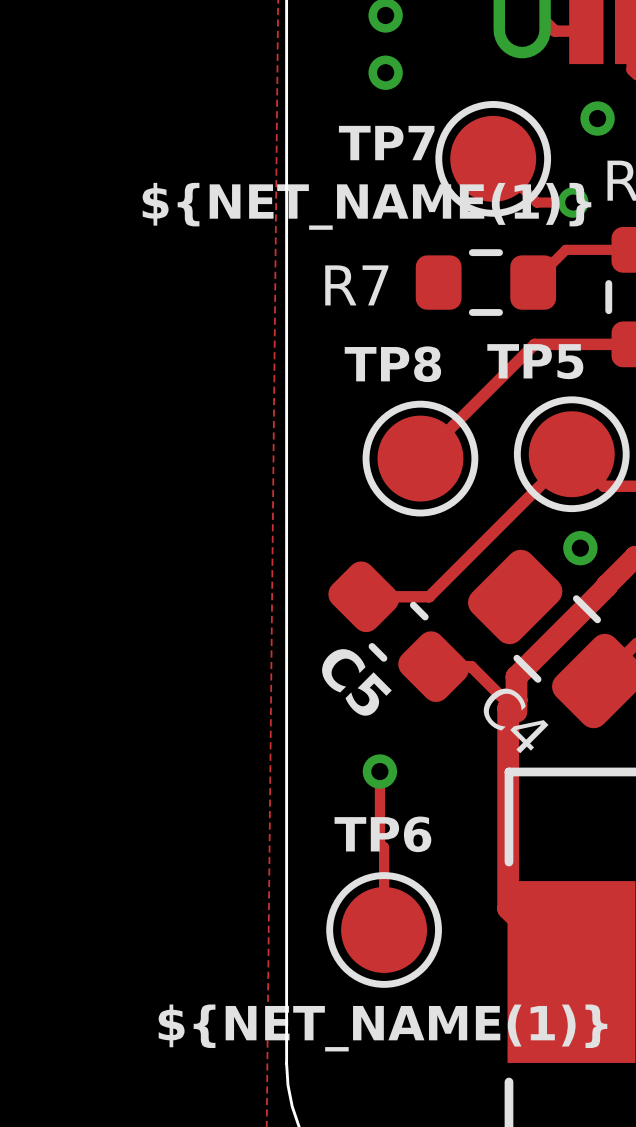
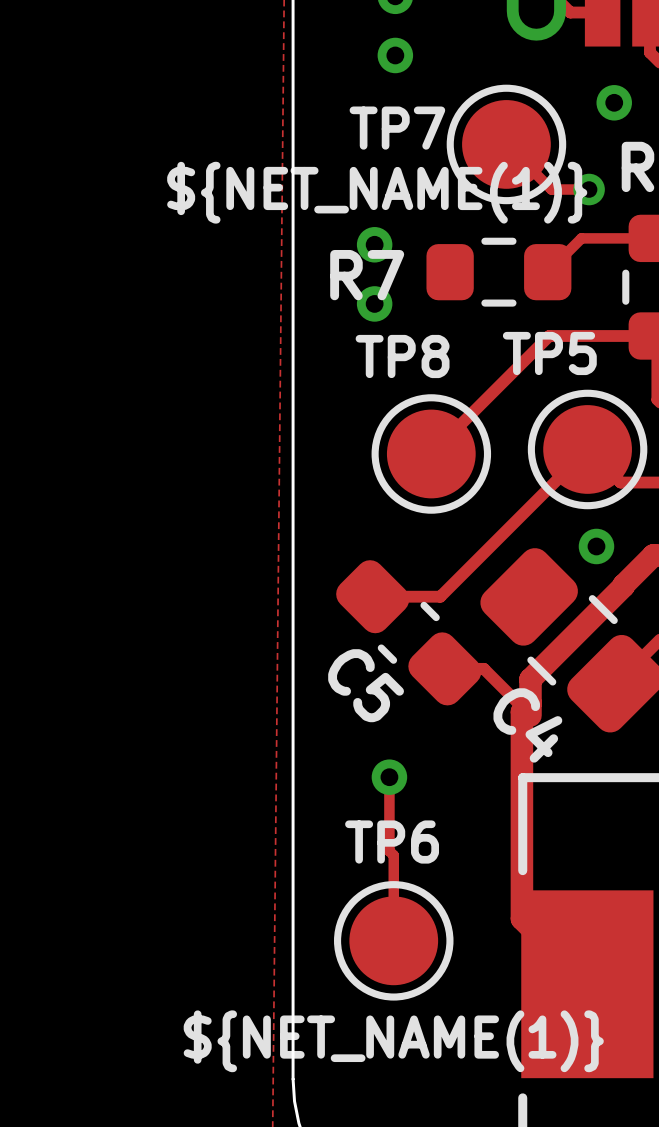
via: none -> (374, 244)
via: none -> (374, 303)

